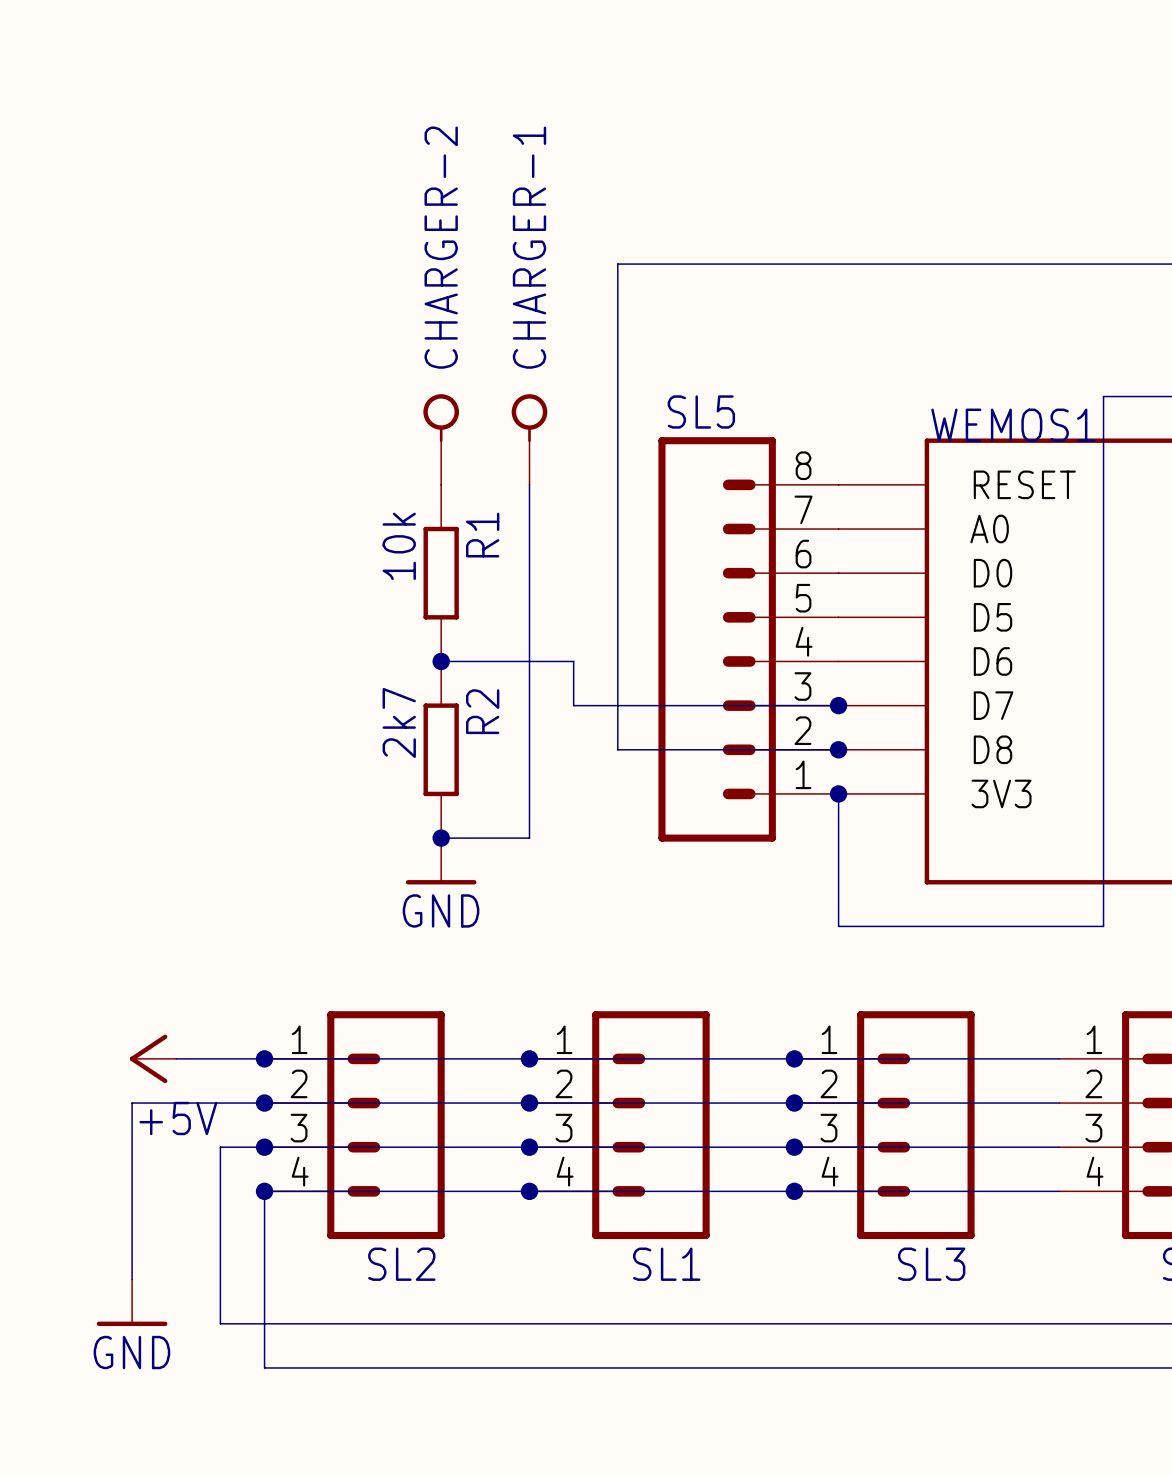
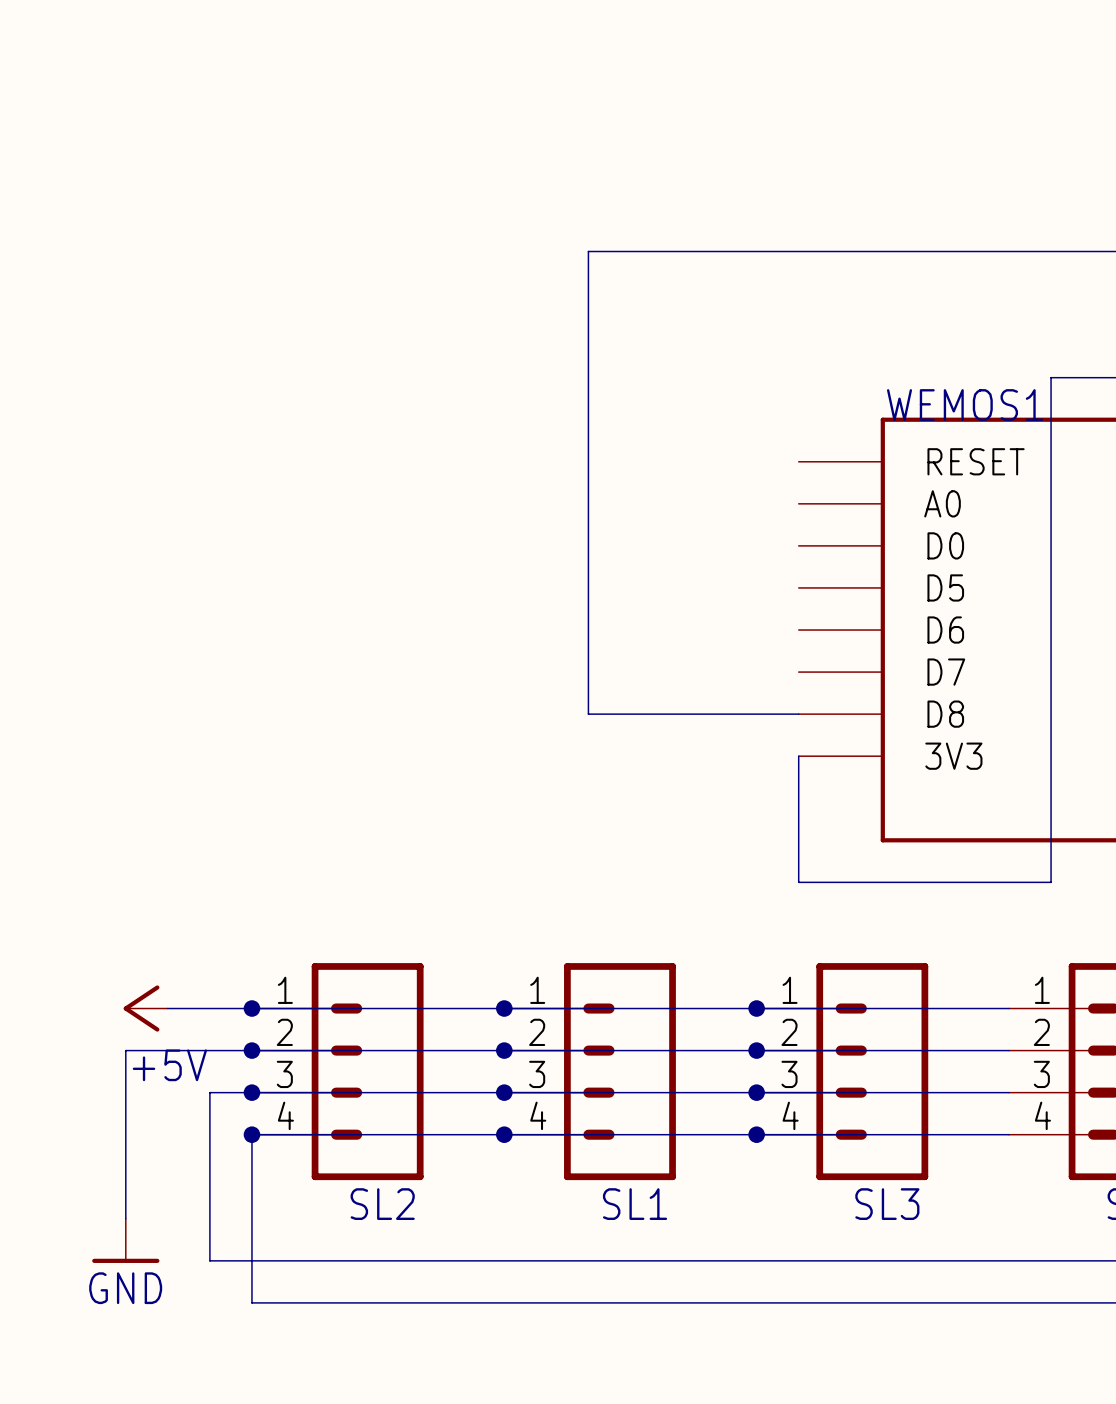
CHARGER-2: (441, 439) -> none
CHARGER-1: (529, 439) -> none
wire: (529, 484) (529, 838) (441, 838) -> none
R1: 10k (441, 573) -> none
SL5: (748, 639) -> none
wire: (441, 661) (573, 661) (573, 705) (838, 705) -> none
junction: (441, 661) -> none
junction: (838, 705) -> none
R2: 2k7 (441, 749) -> none
junction: (838, 749) -> none
junction: (838, 793) -> none
junction: (441, 838) -> none
power symbol: GND (441, 861) -> none

